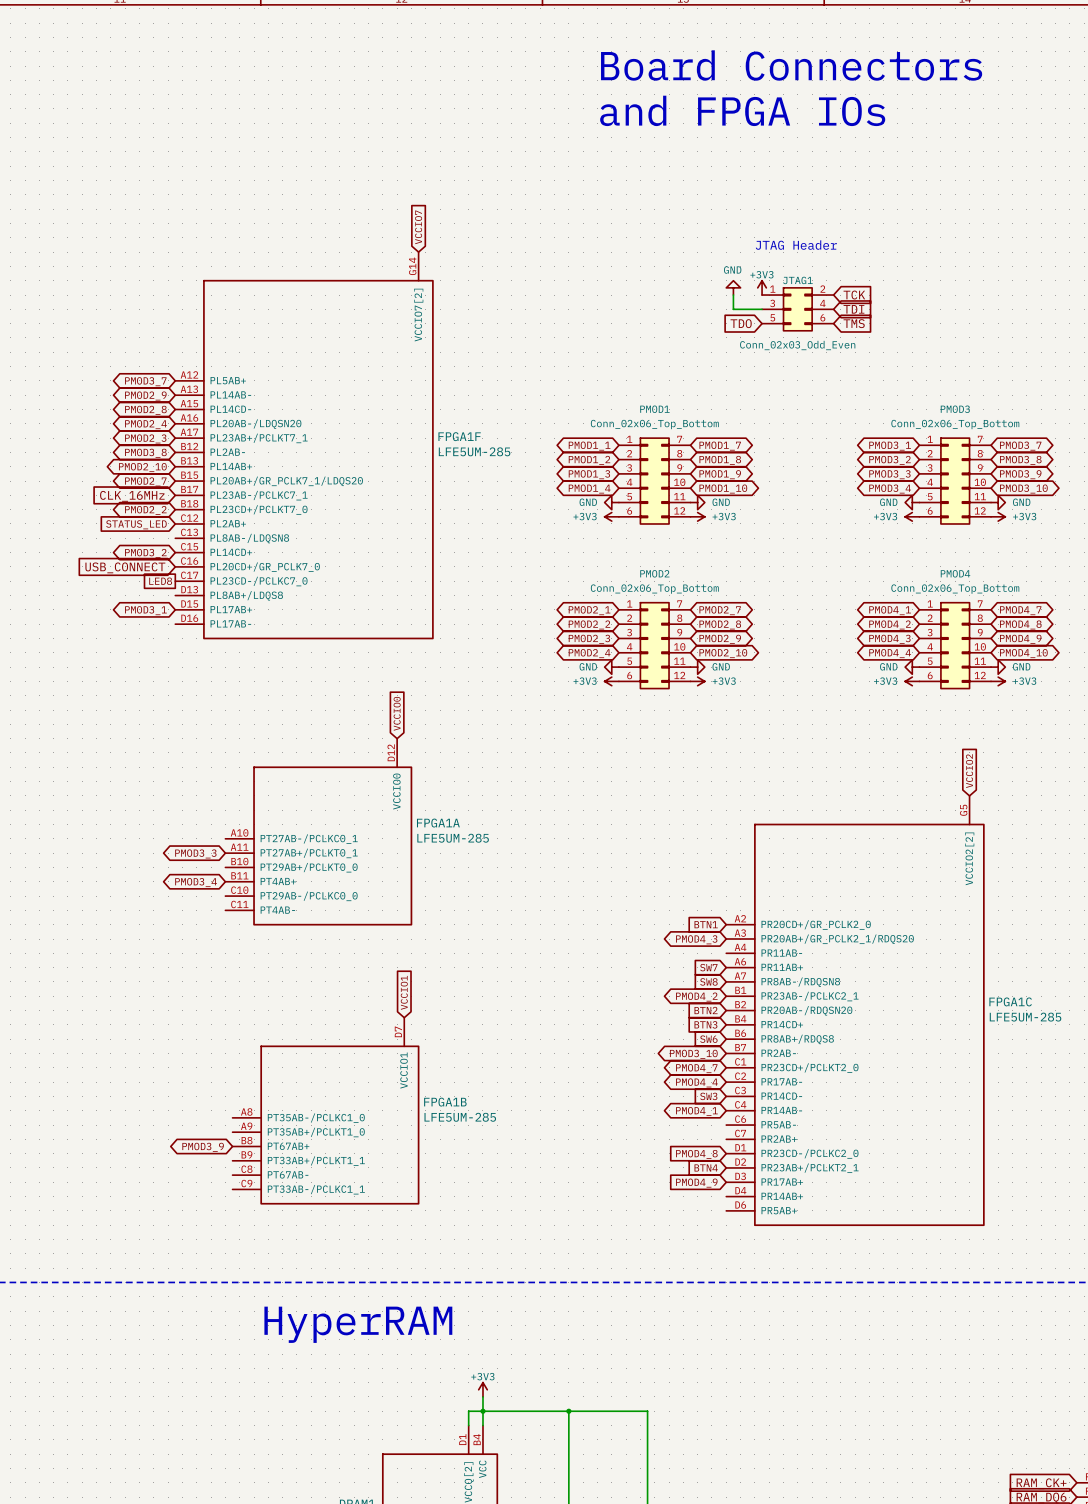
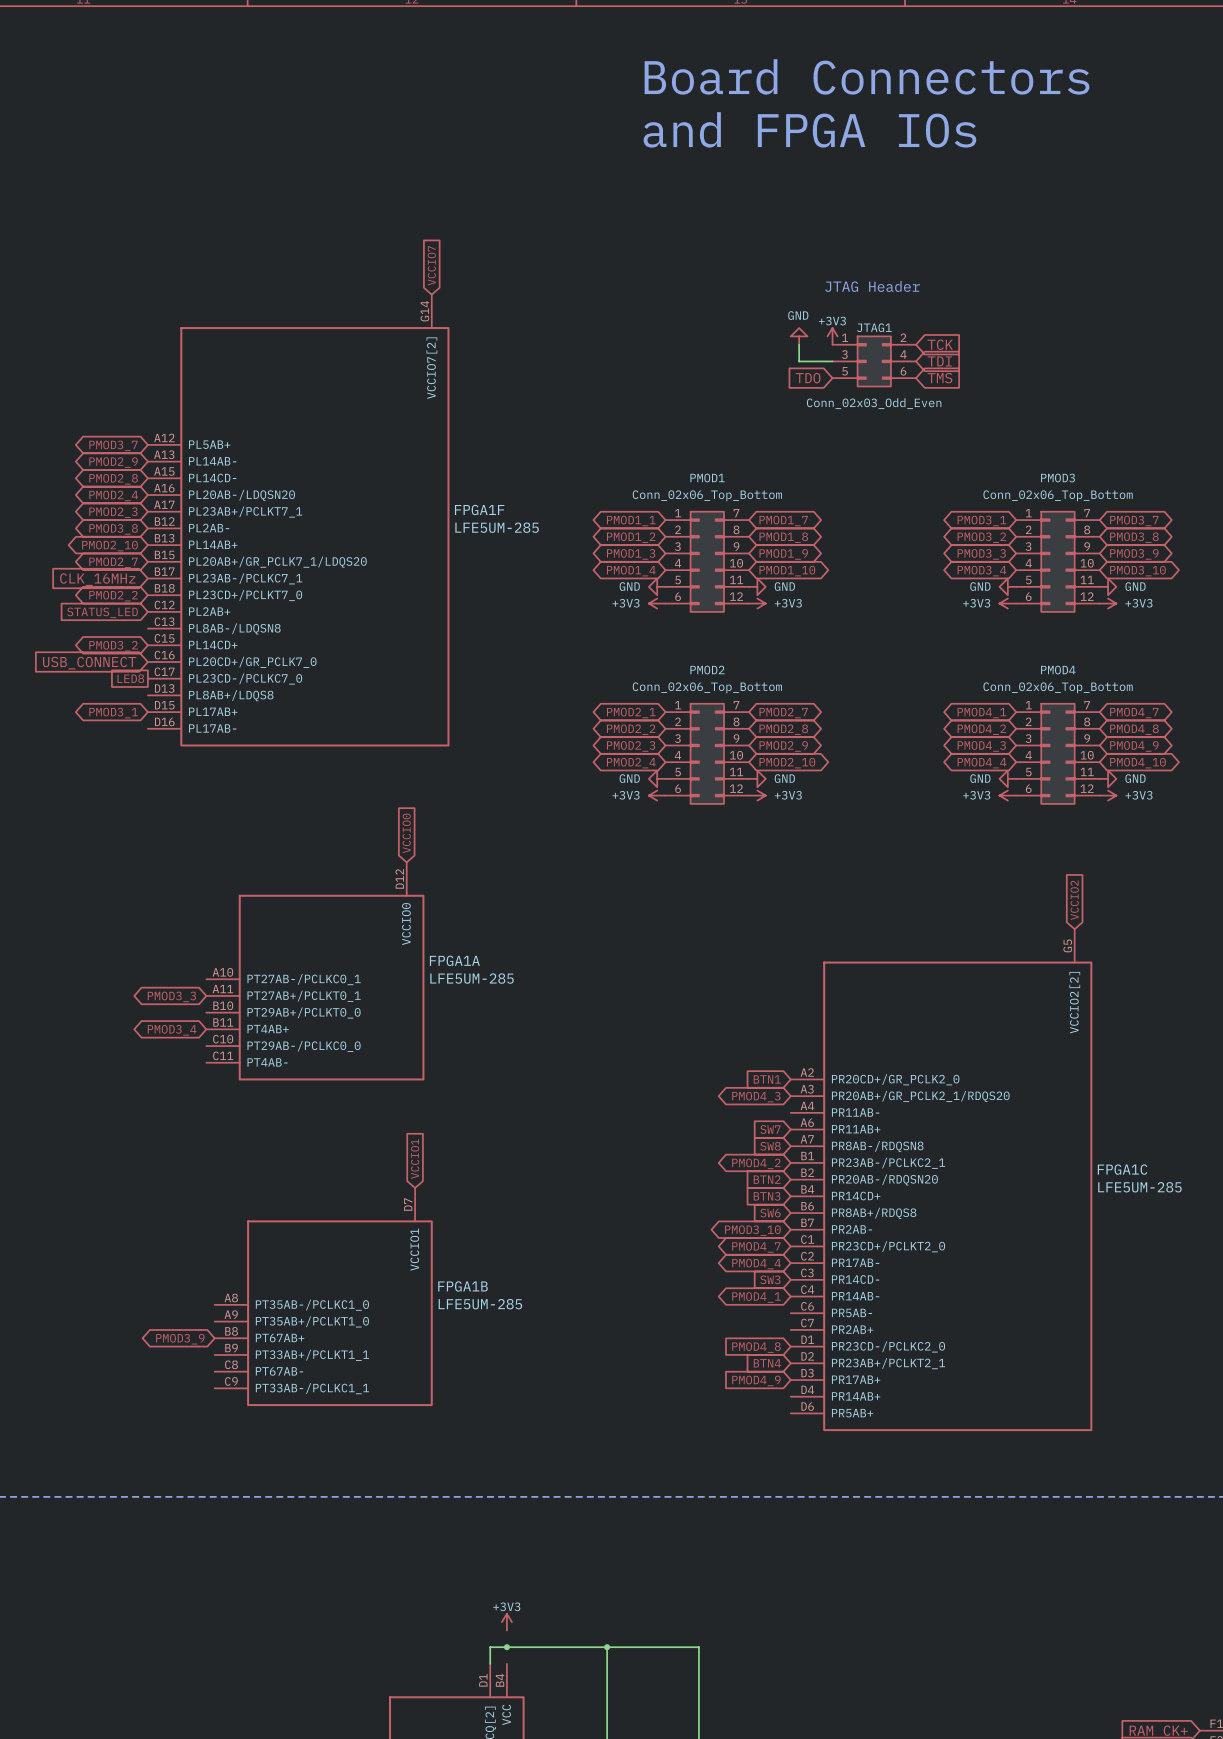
text: HyperRAM (358, 1324) -> none
wire: (482, 1396) (482, 1425) -> none

